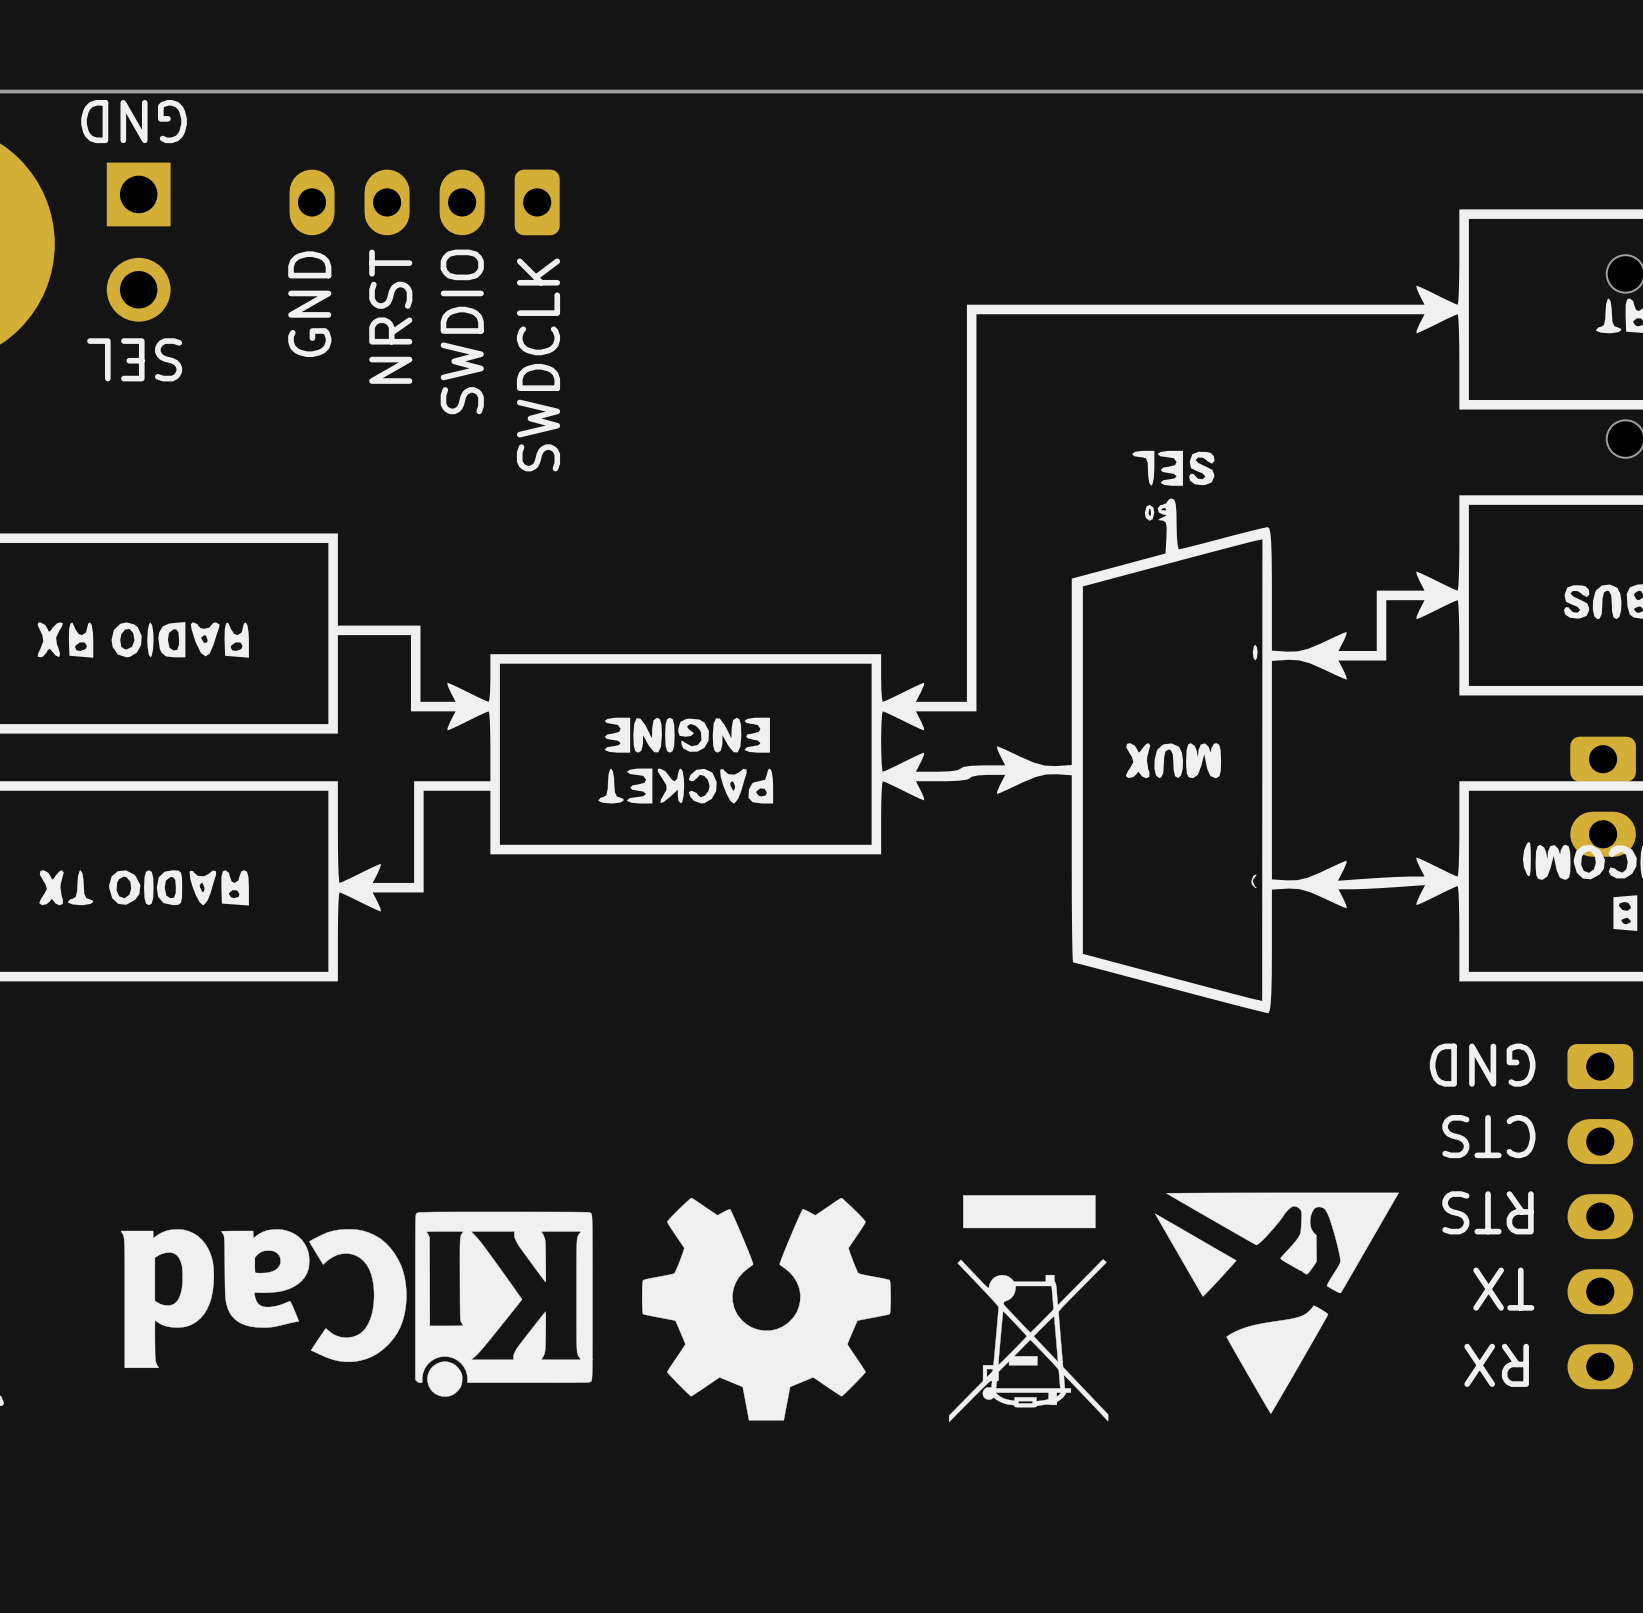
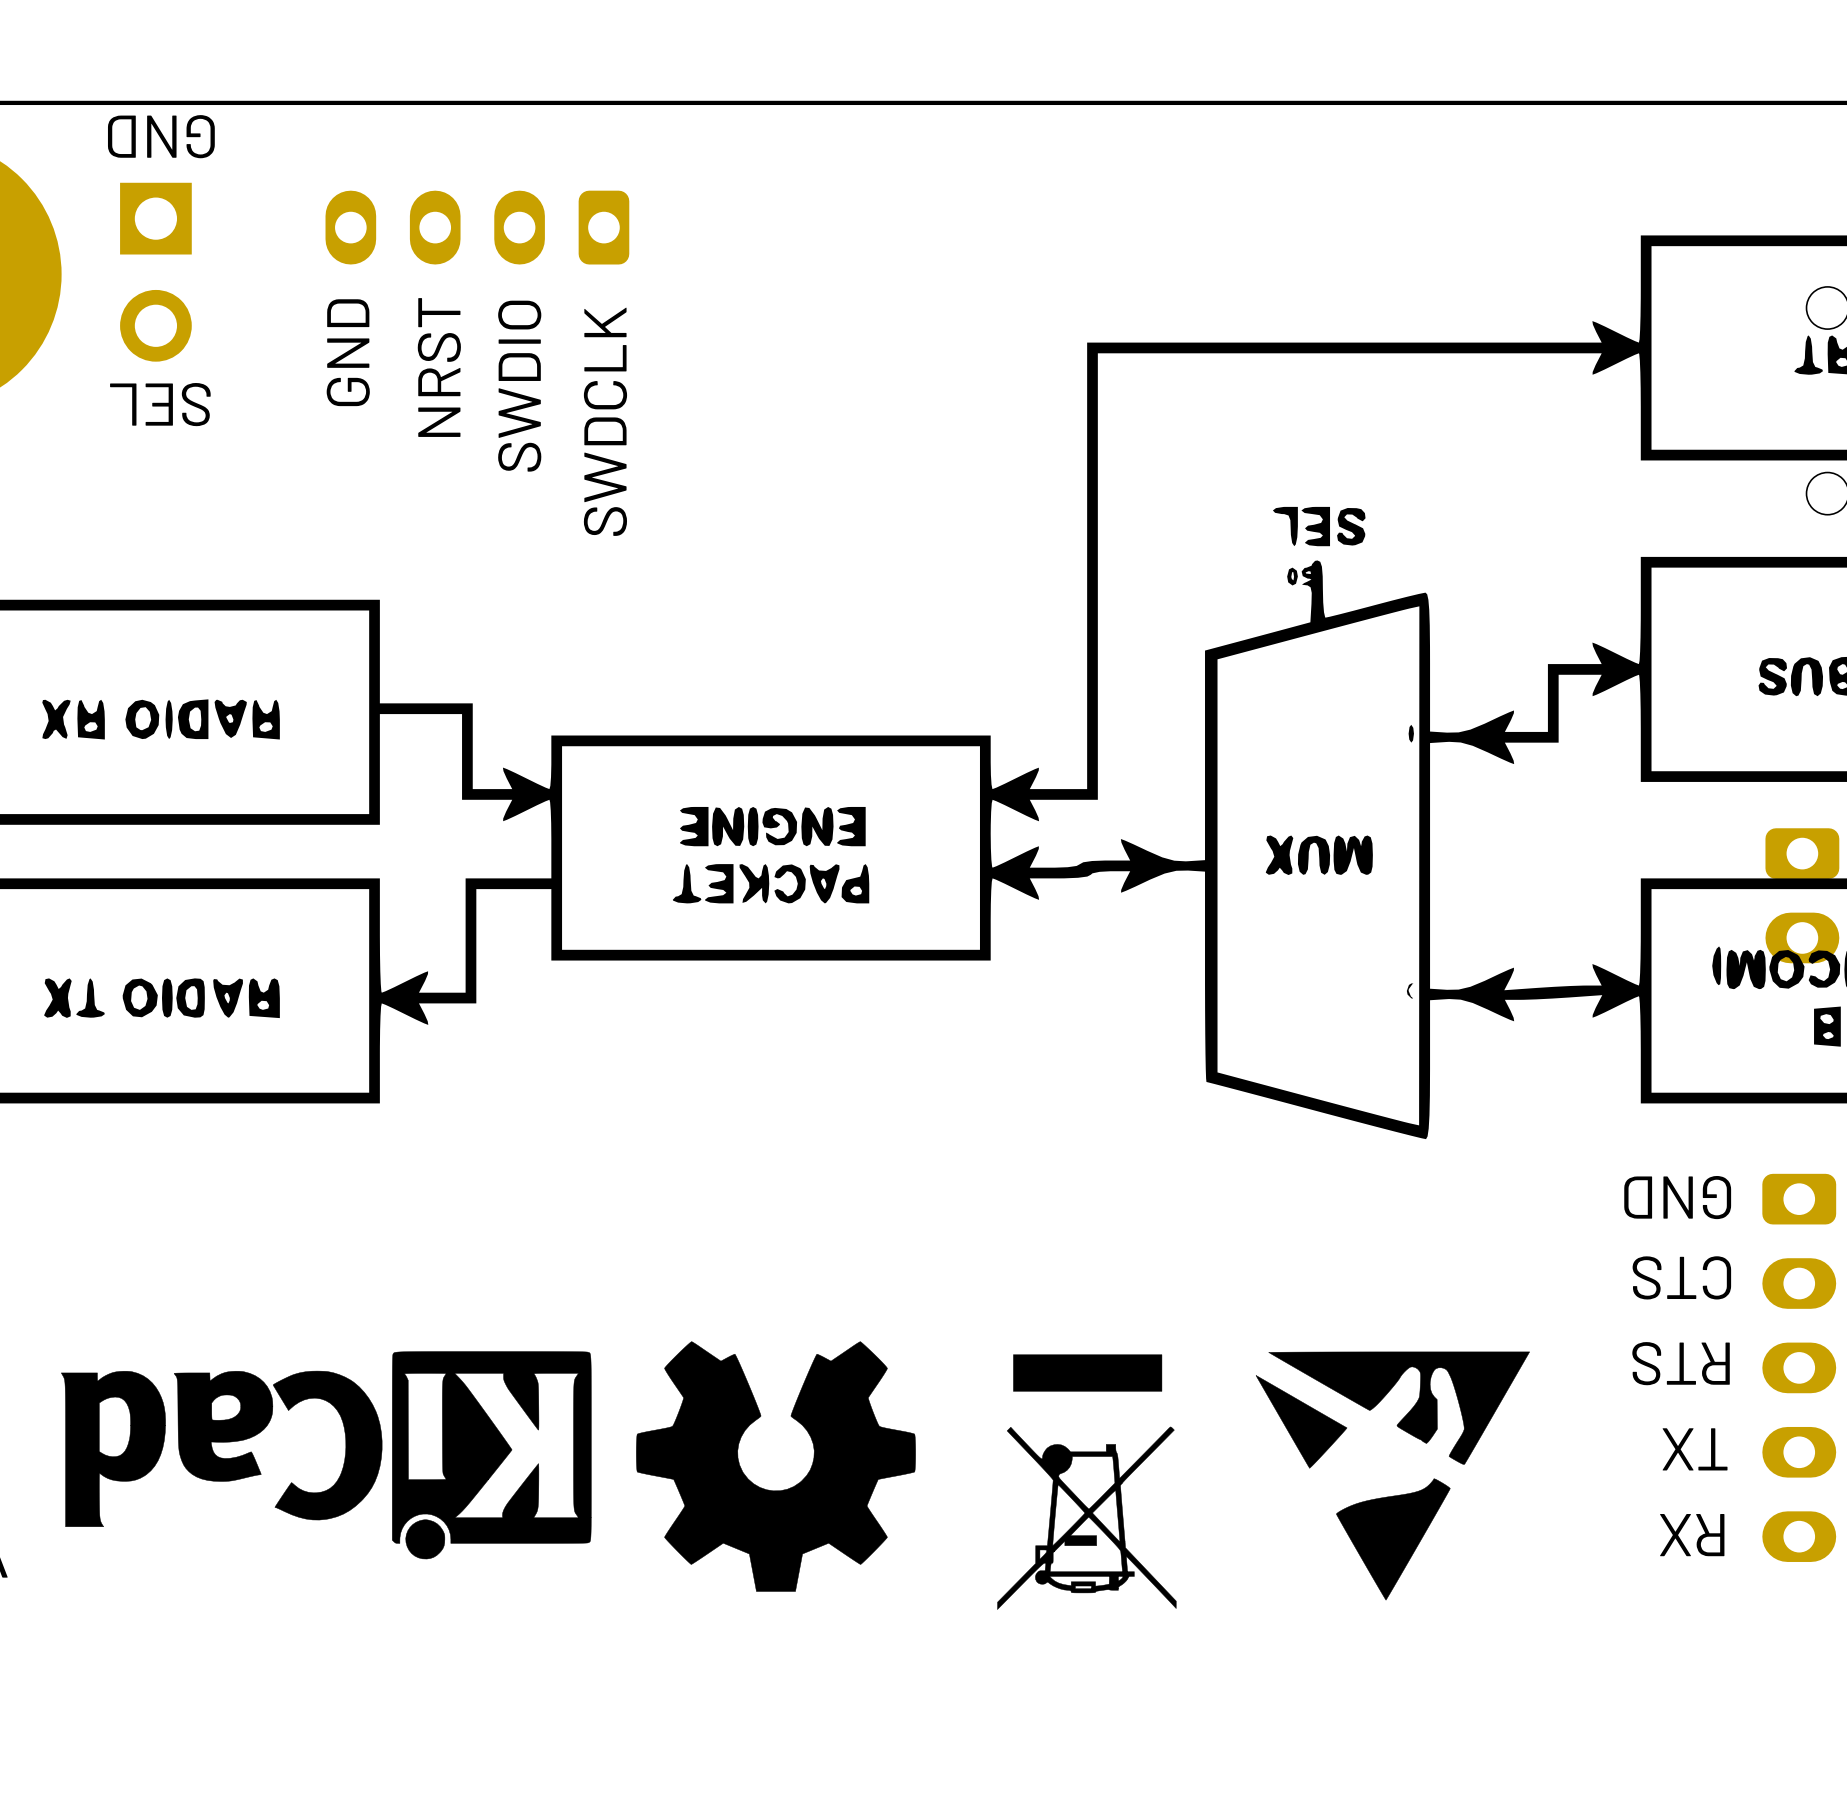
drawing position: (1276, 1303) -> (1392, 1476)
drawing position: (356, 1304) -> (326, 1455)
drawing position: (1028, 1308) -> (1086, 1482)
drawing position: (766, 1309) -> (775, 1466)

